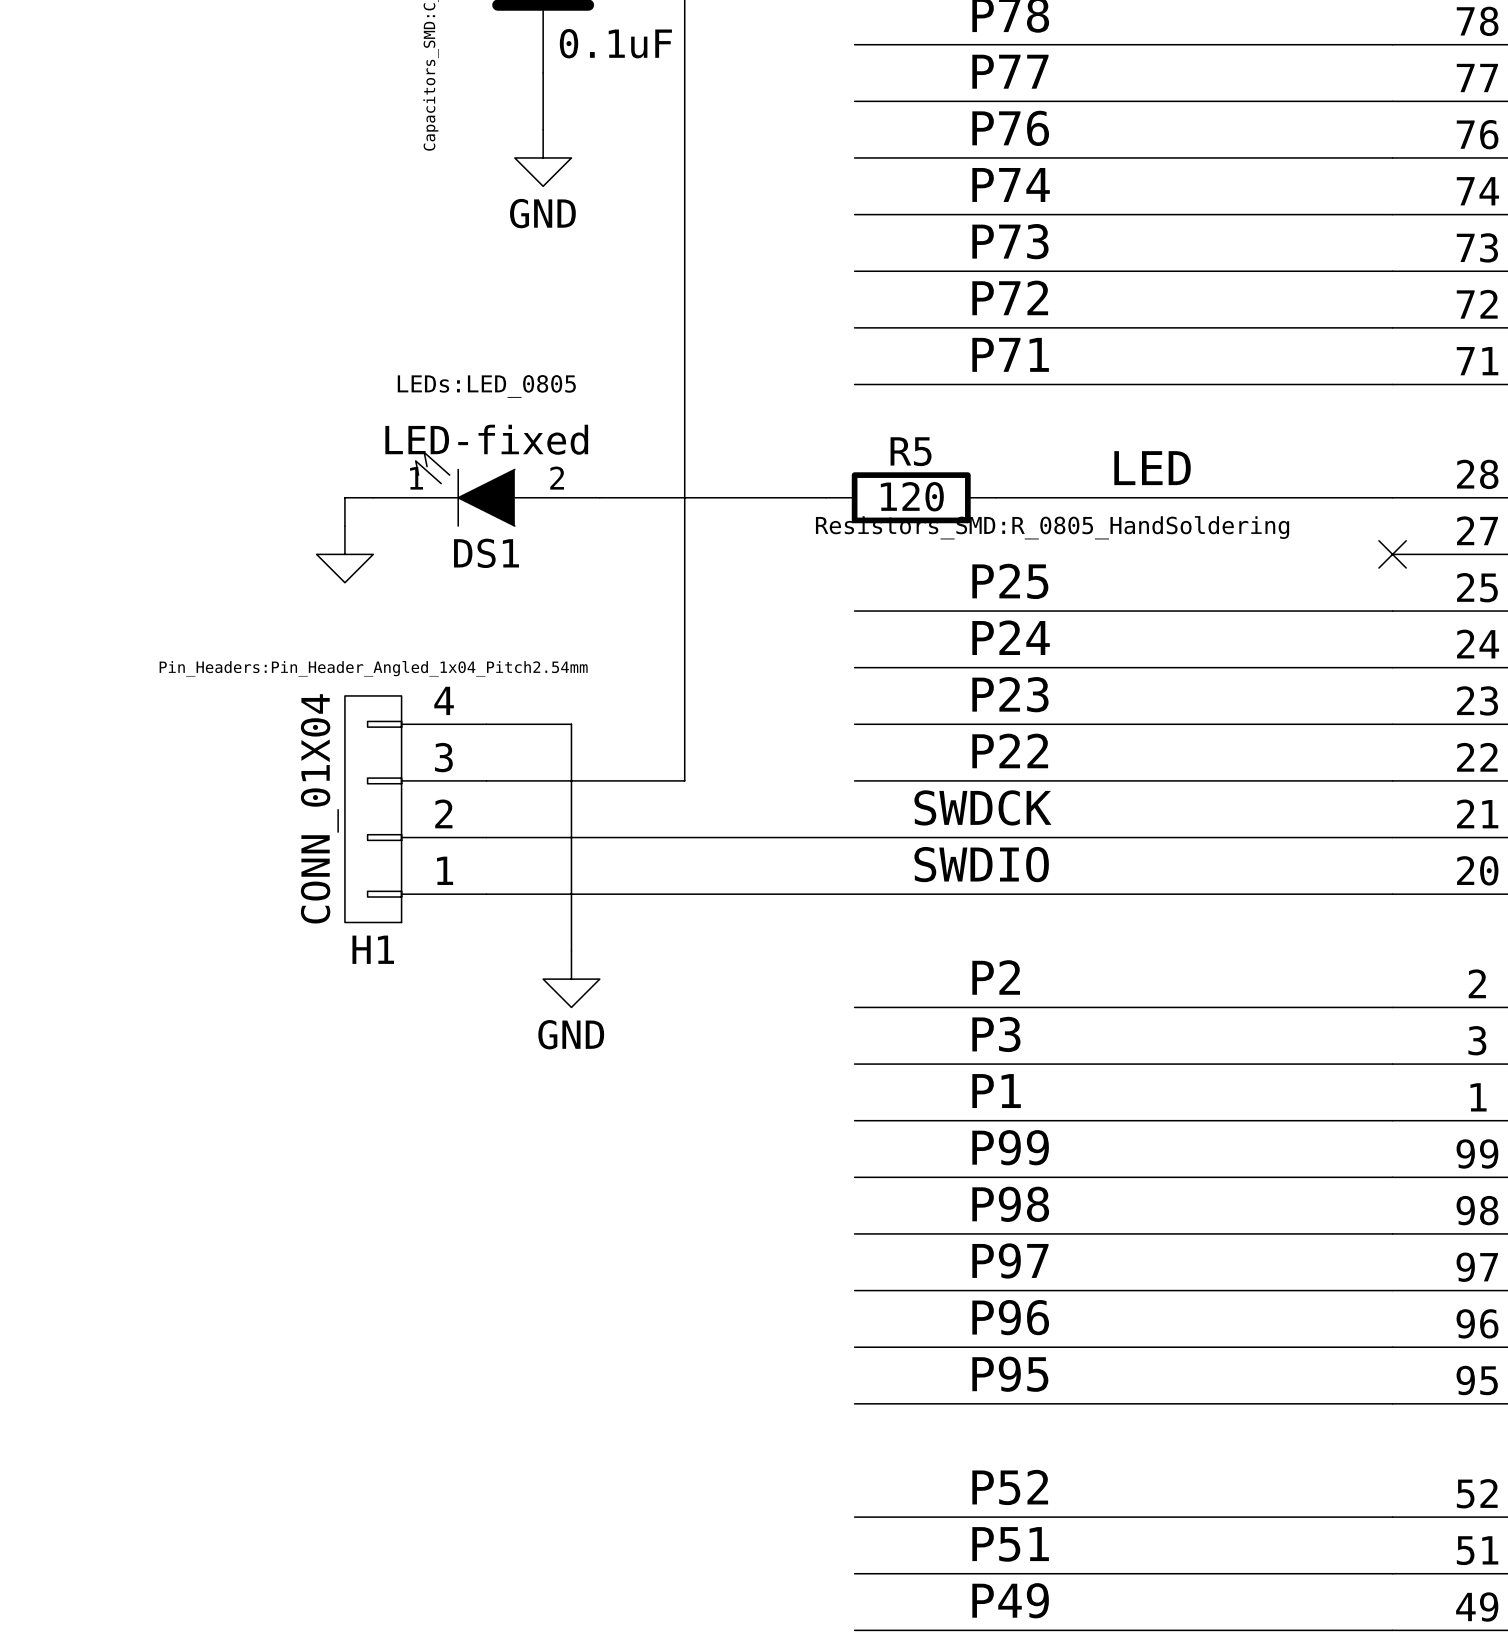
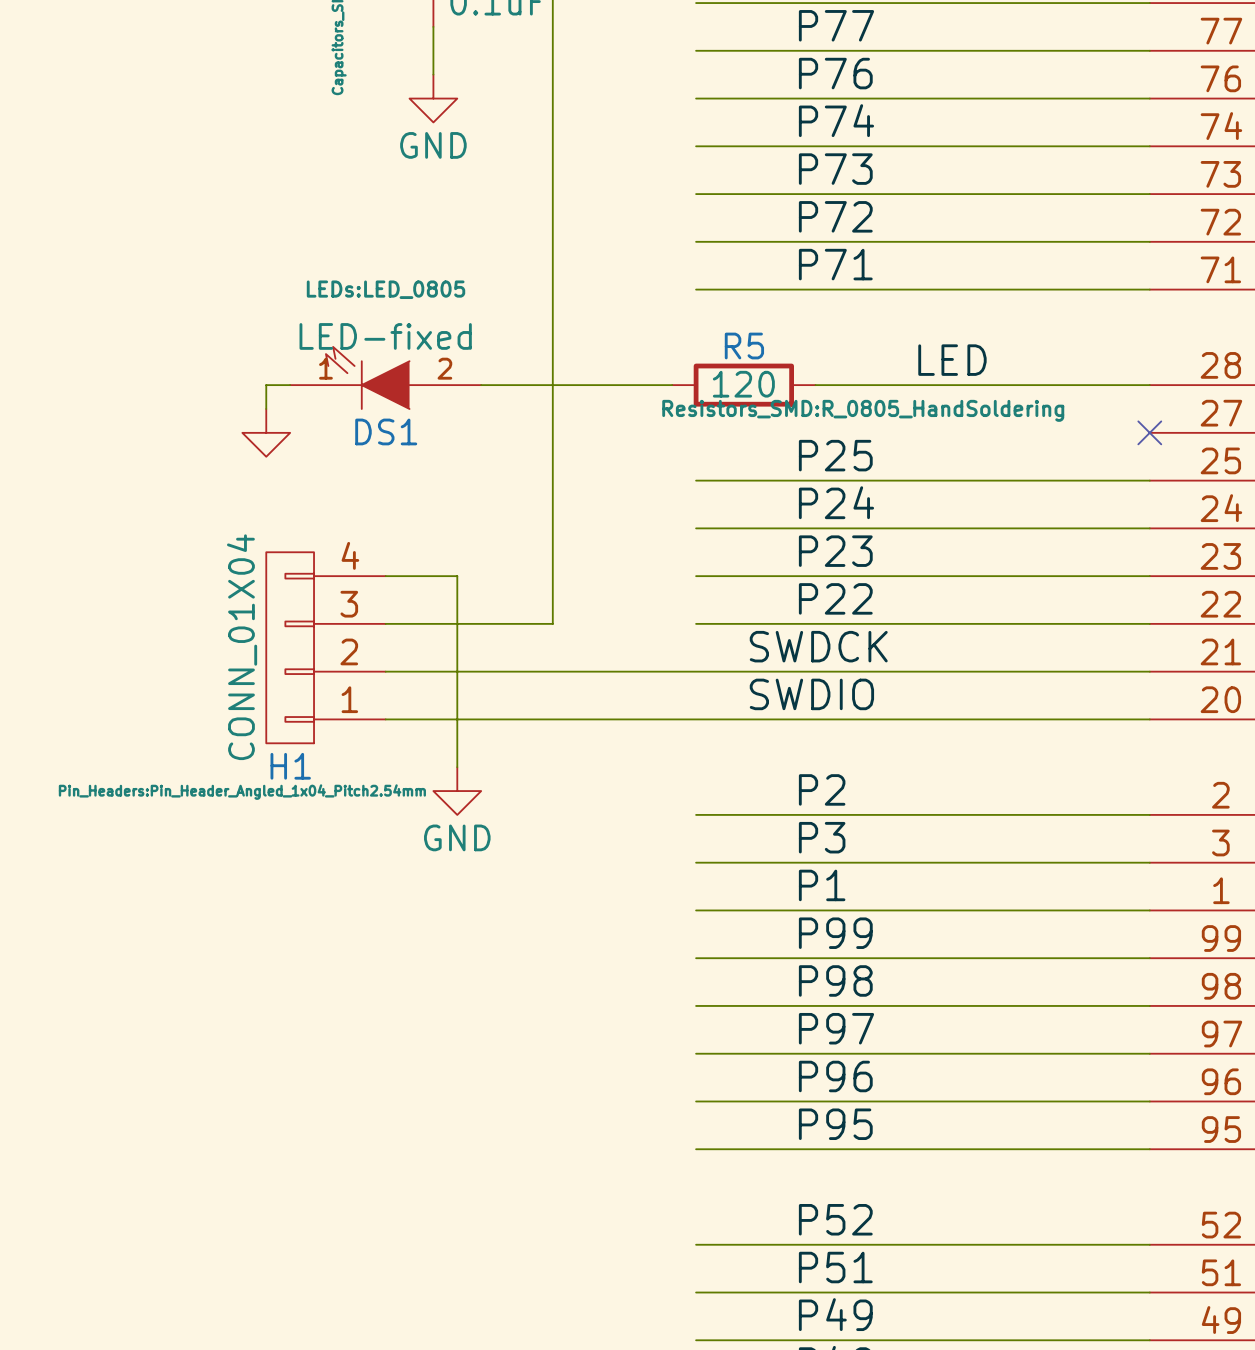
H1 text position: Pin_Headers:Pin_Header_Angled_1x04_Pitch2.54mm (373, 668) -> Pin_Headers:Pin_Header_Angled_1x04_Pitch2.54mm (242, 792)

